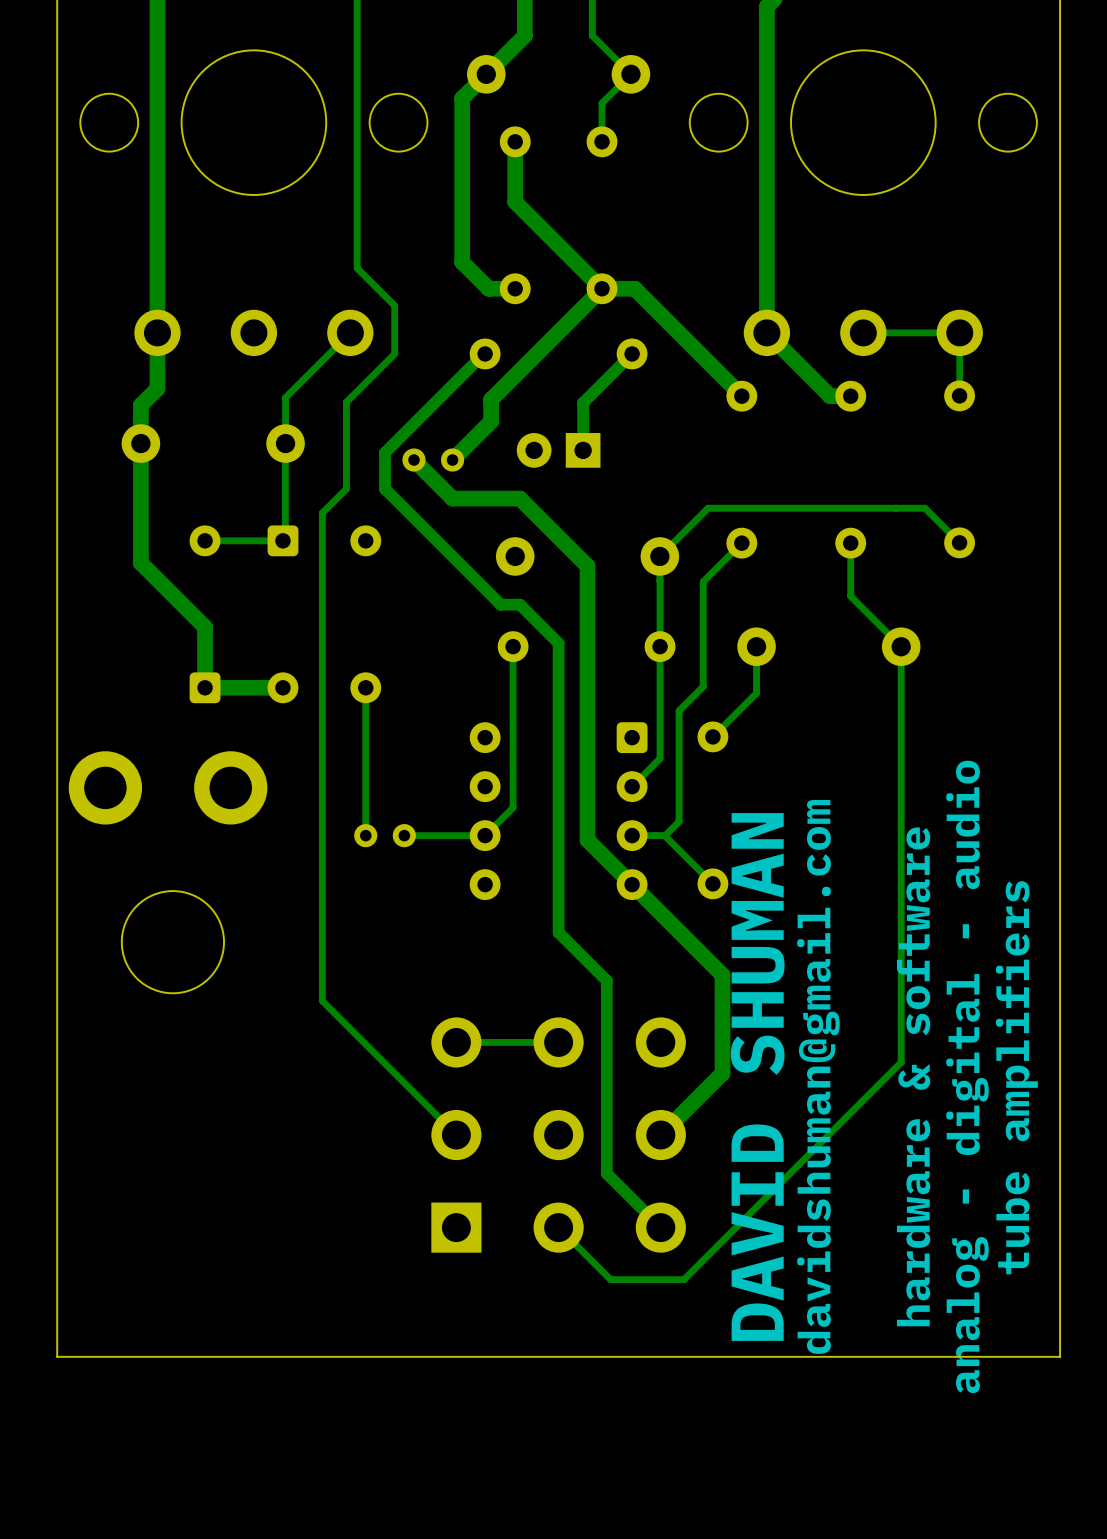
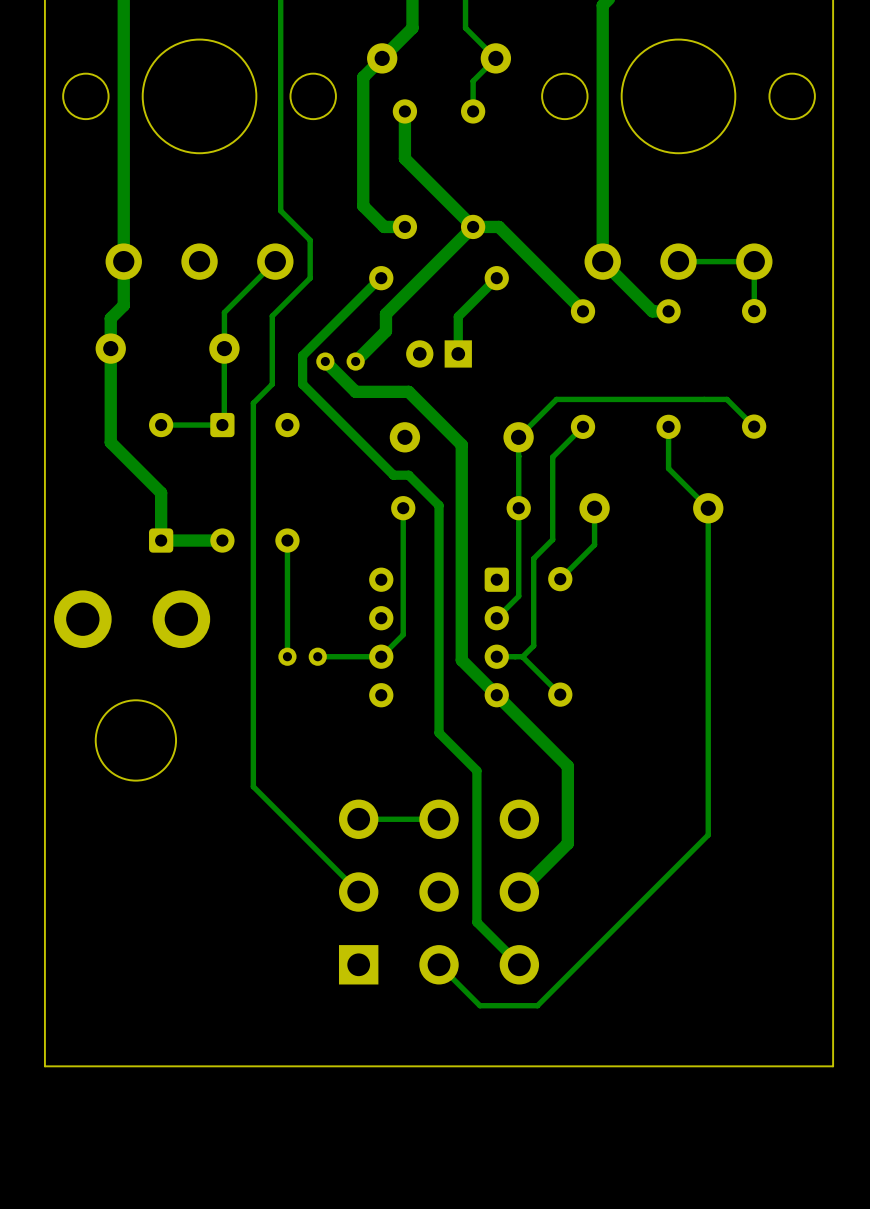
text: DAVID SHUMAN (757, 1076) -> none
text: davidshuman@gmail.com (818, 1076) -> none
text: hardware & software (913, 1076) -> none
text: analog - digital - audio (967, 1076) -> none
text: tube amplifiers (1016, 1077) -> none

